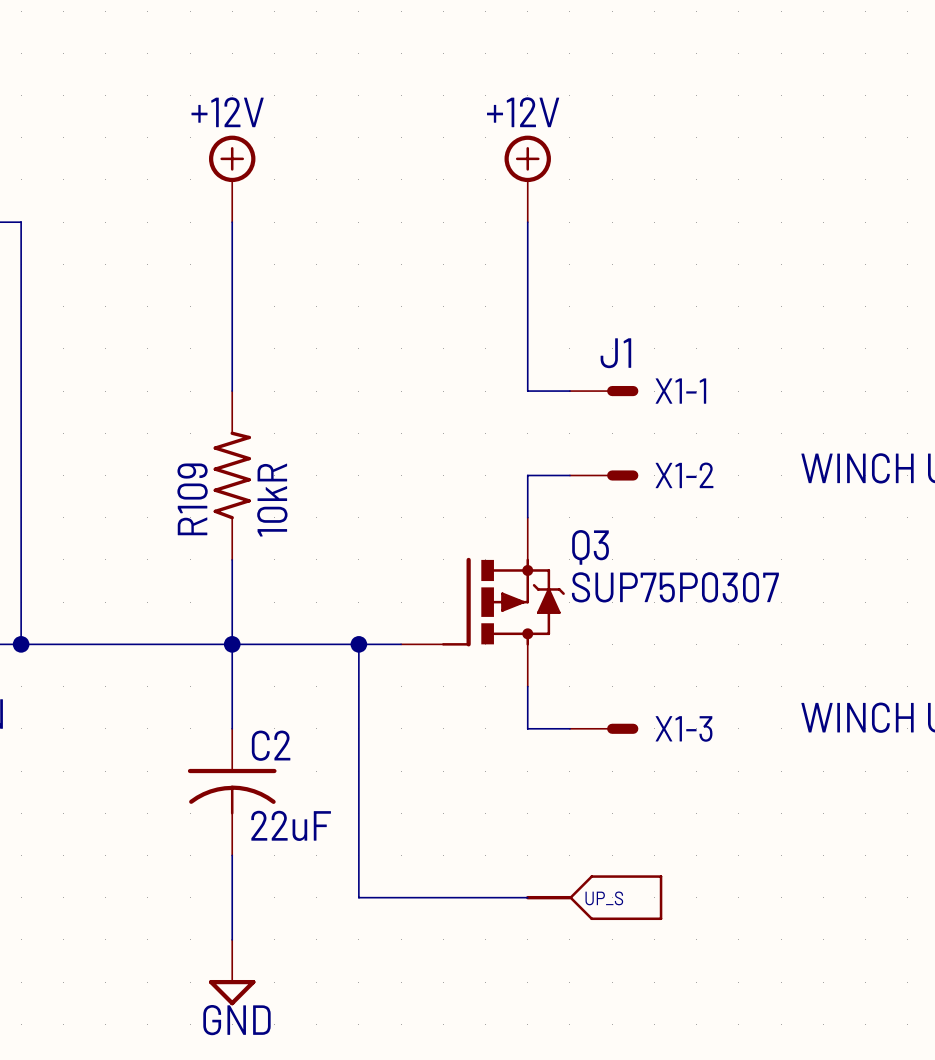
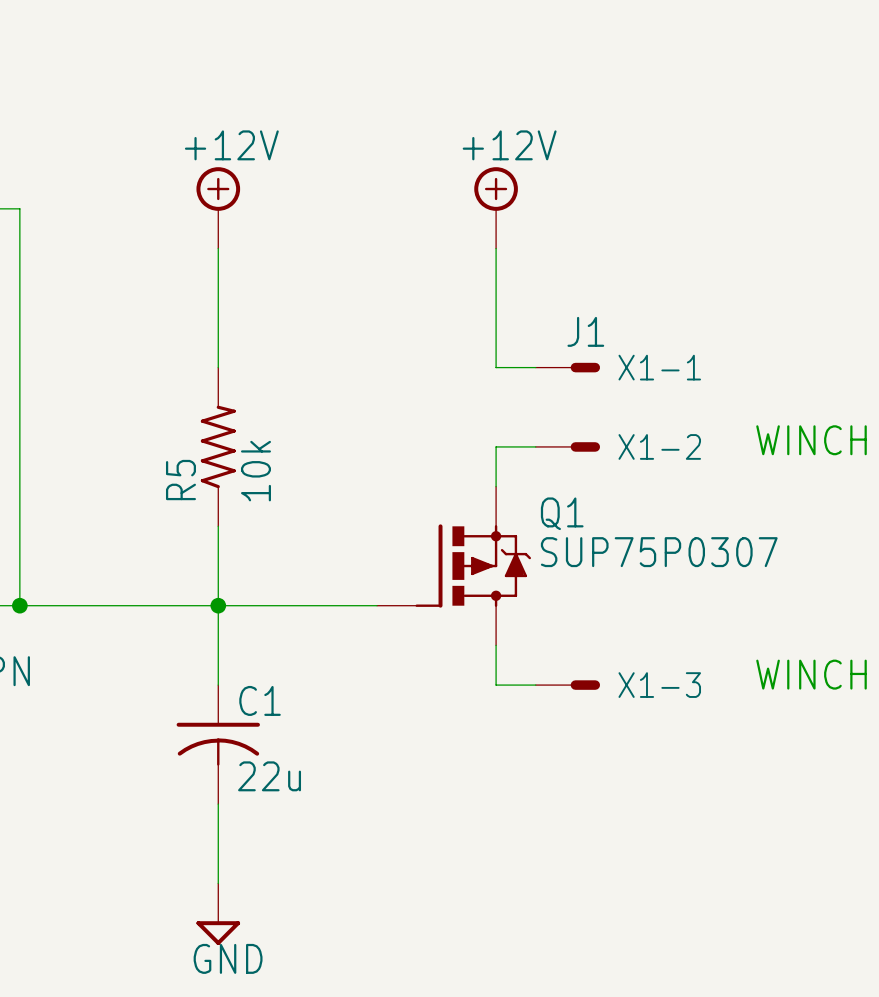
power symbol position: +12V (232, 178) -> +12V (218, 207)
power symbol position: +12V (527, 178) -> +12V (496, 207)
R109 name: R109 (192, 499) -> R5 (180, 480)
R109 value: 10kR (272, 500) -> 10k (255, 471)
Q3 name: Q3 (590, 547) -> Q1 (562, 513)
wire: (358, 644) (358, 897) (527, 897) -> none
junction: (358, 644) -> none
C2 name: C2 (271, 745) -> C1 (260, 700)
C2 value: 22uF (291, 825) -> 22u (269, 776)
part: UP_S (594, 897) -> none

